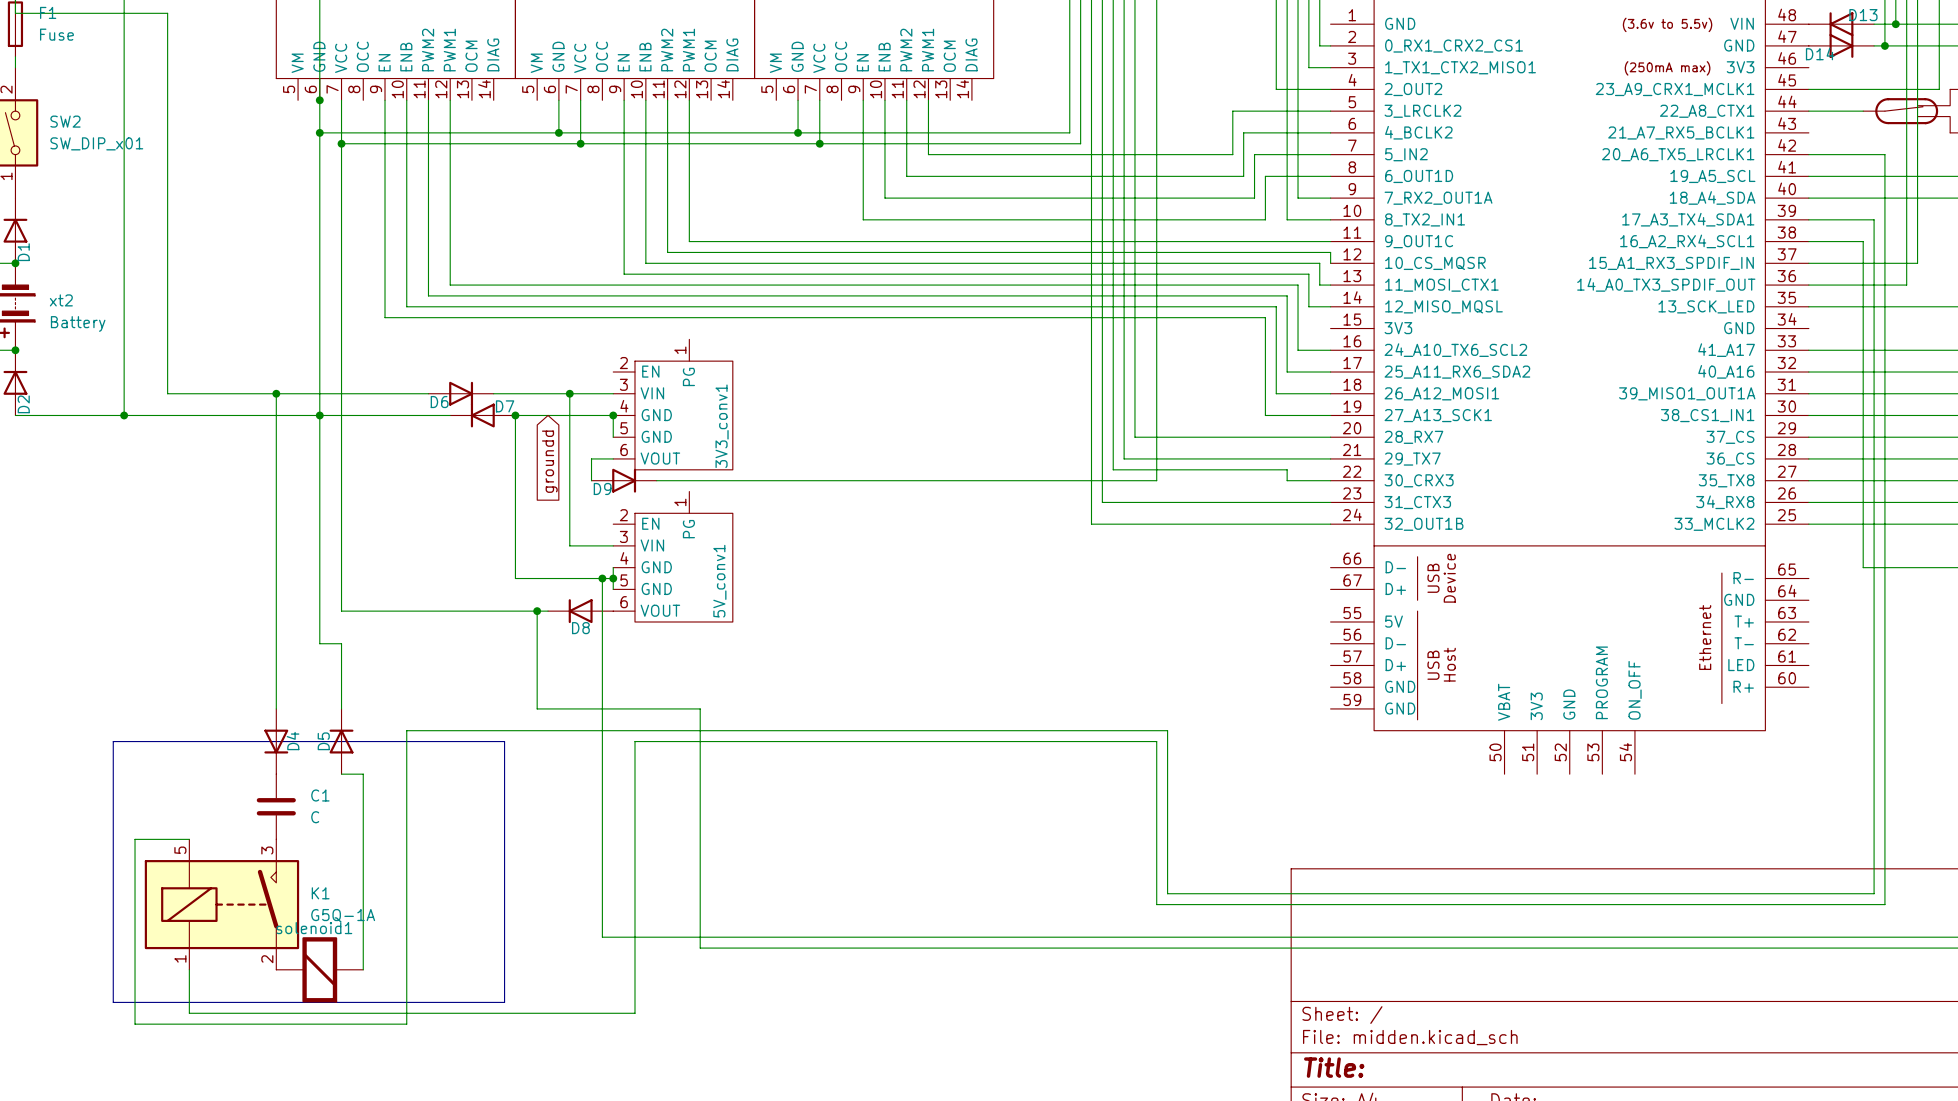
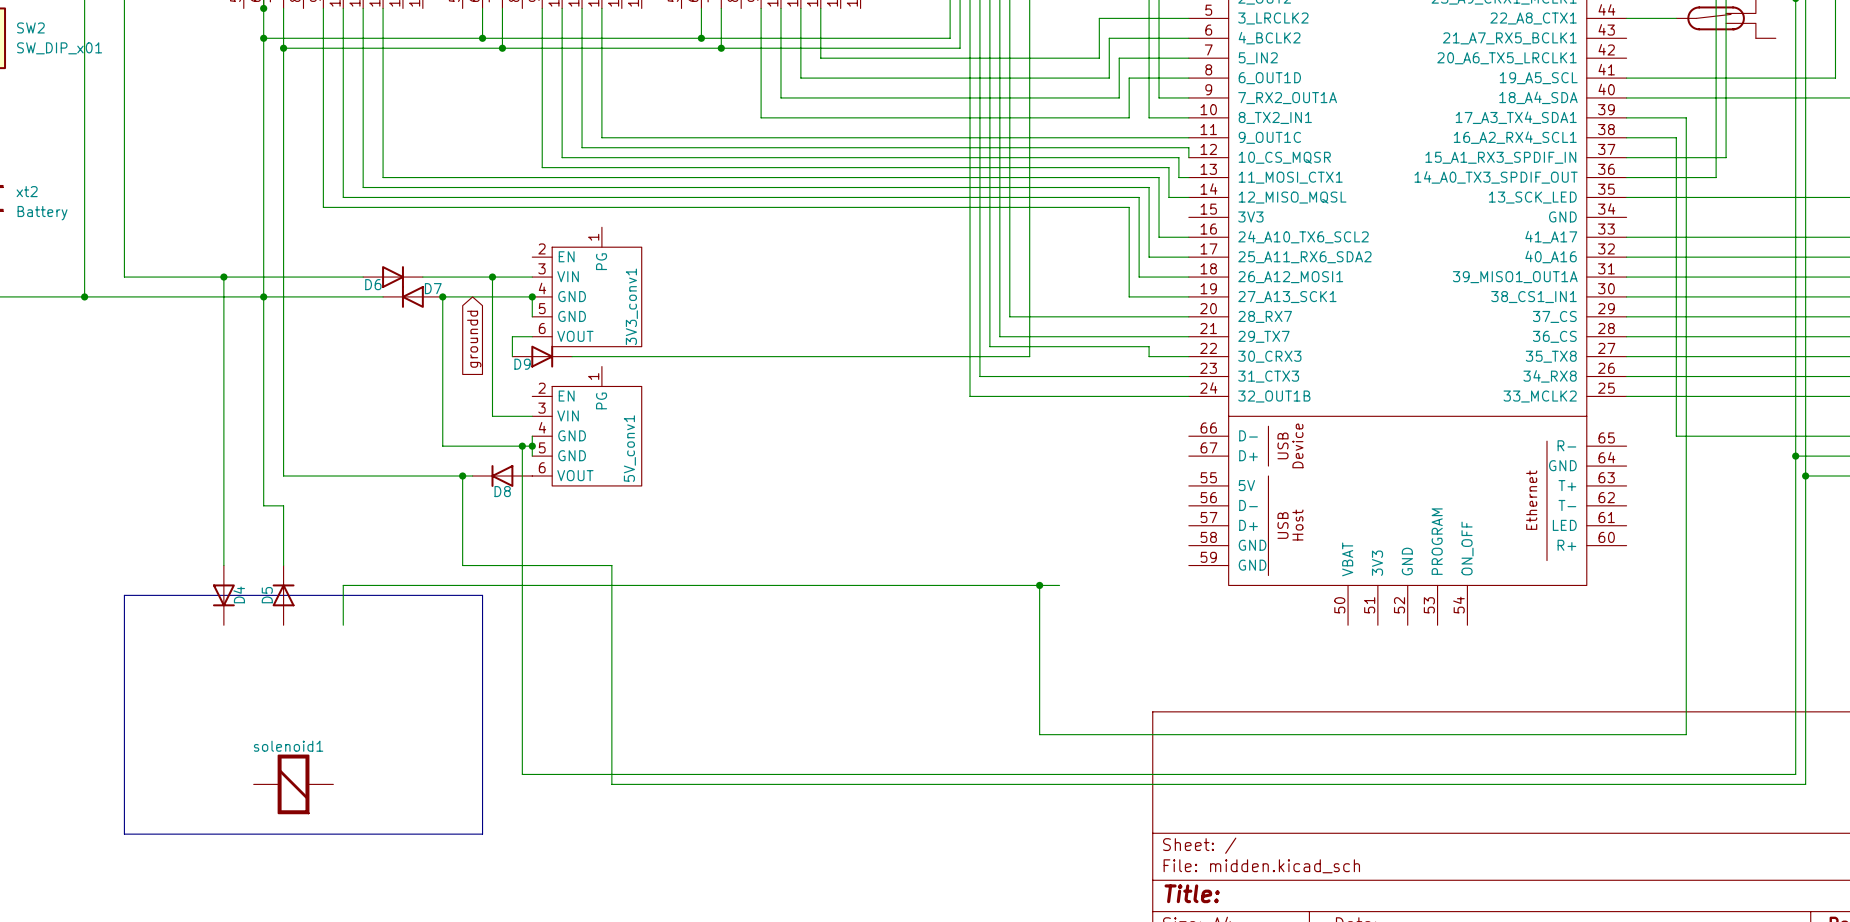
wire: (1808, 154) (1884, 154) (1884, 904) (1156, 904) (1156, 741) (634, 741) (634, 1013) (189, 1013) (189, 969) -> none
wire: none -> (1039, 585) (1059, 585)
junction: none -> (1039, 585)
line: (167, 741) (113, 741) (113, 1002) (167, 1002) -> (124, 595) (124, 834)
line: (504, 741) (504, 1002) -> (432, 595) (482, 595) (482, 834) (432, 834)
wire: (341, 774) (363, 774) (363, 969) -> none
wire: (406, 774) (406, 1024) (135, 1024) (135, 839) (189, 839) -> none
C1: C (276, 806) -> none
K1: G5Q-1A (221, 904) -> none
solenoid1 position: (319, 969) -> (293, 784)

